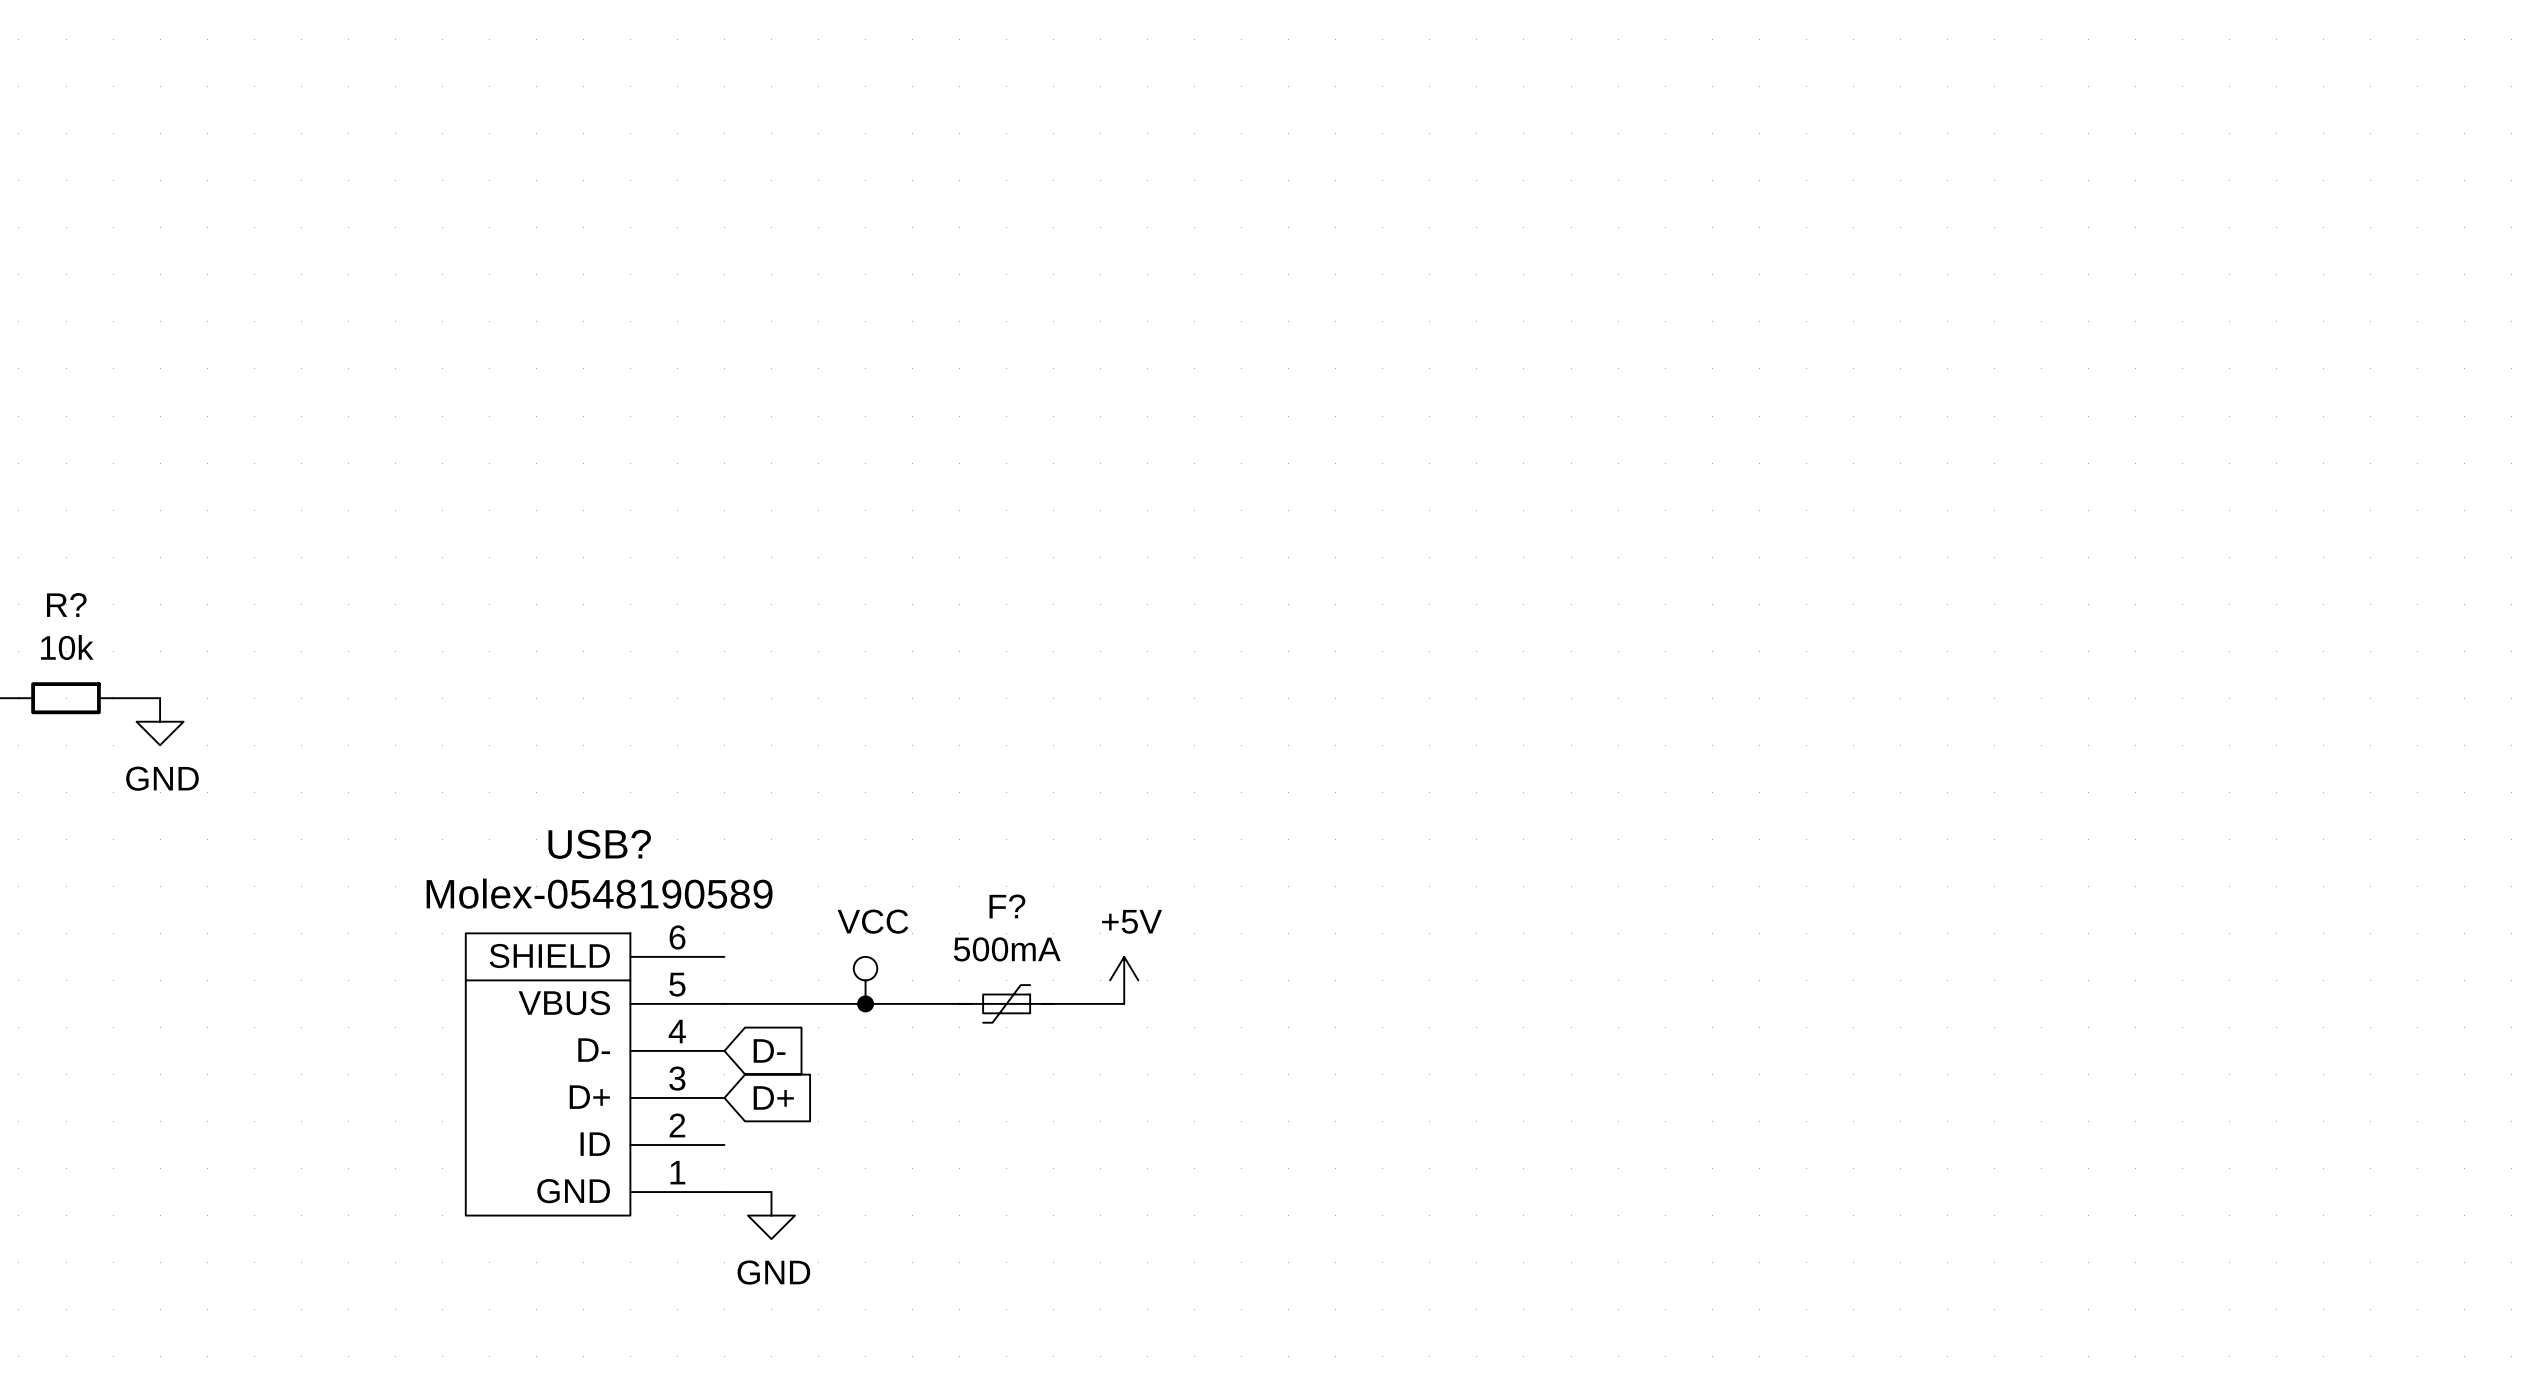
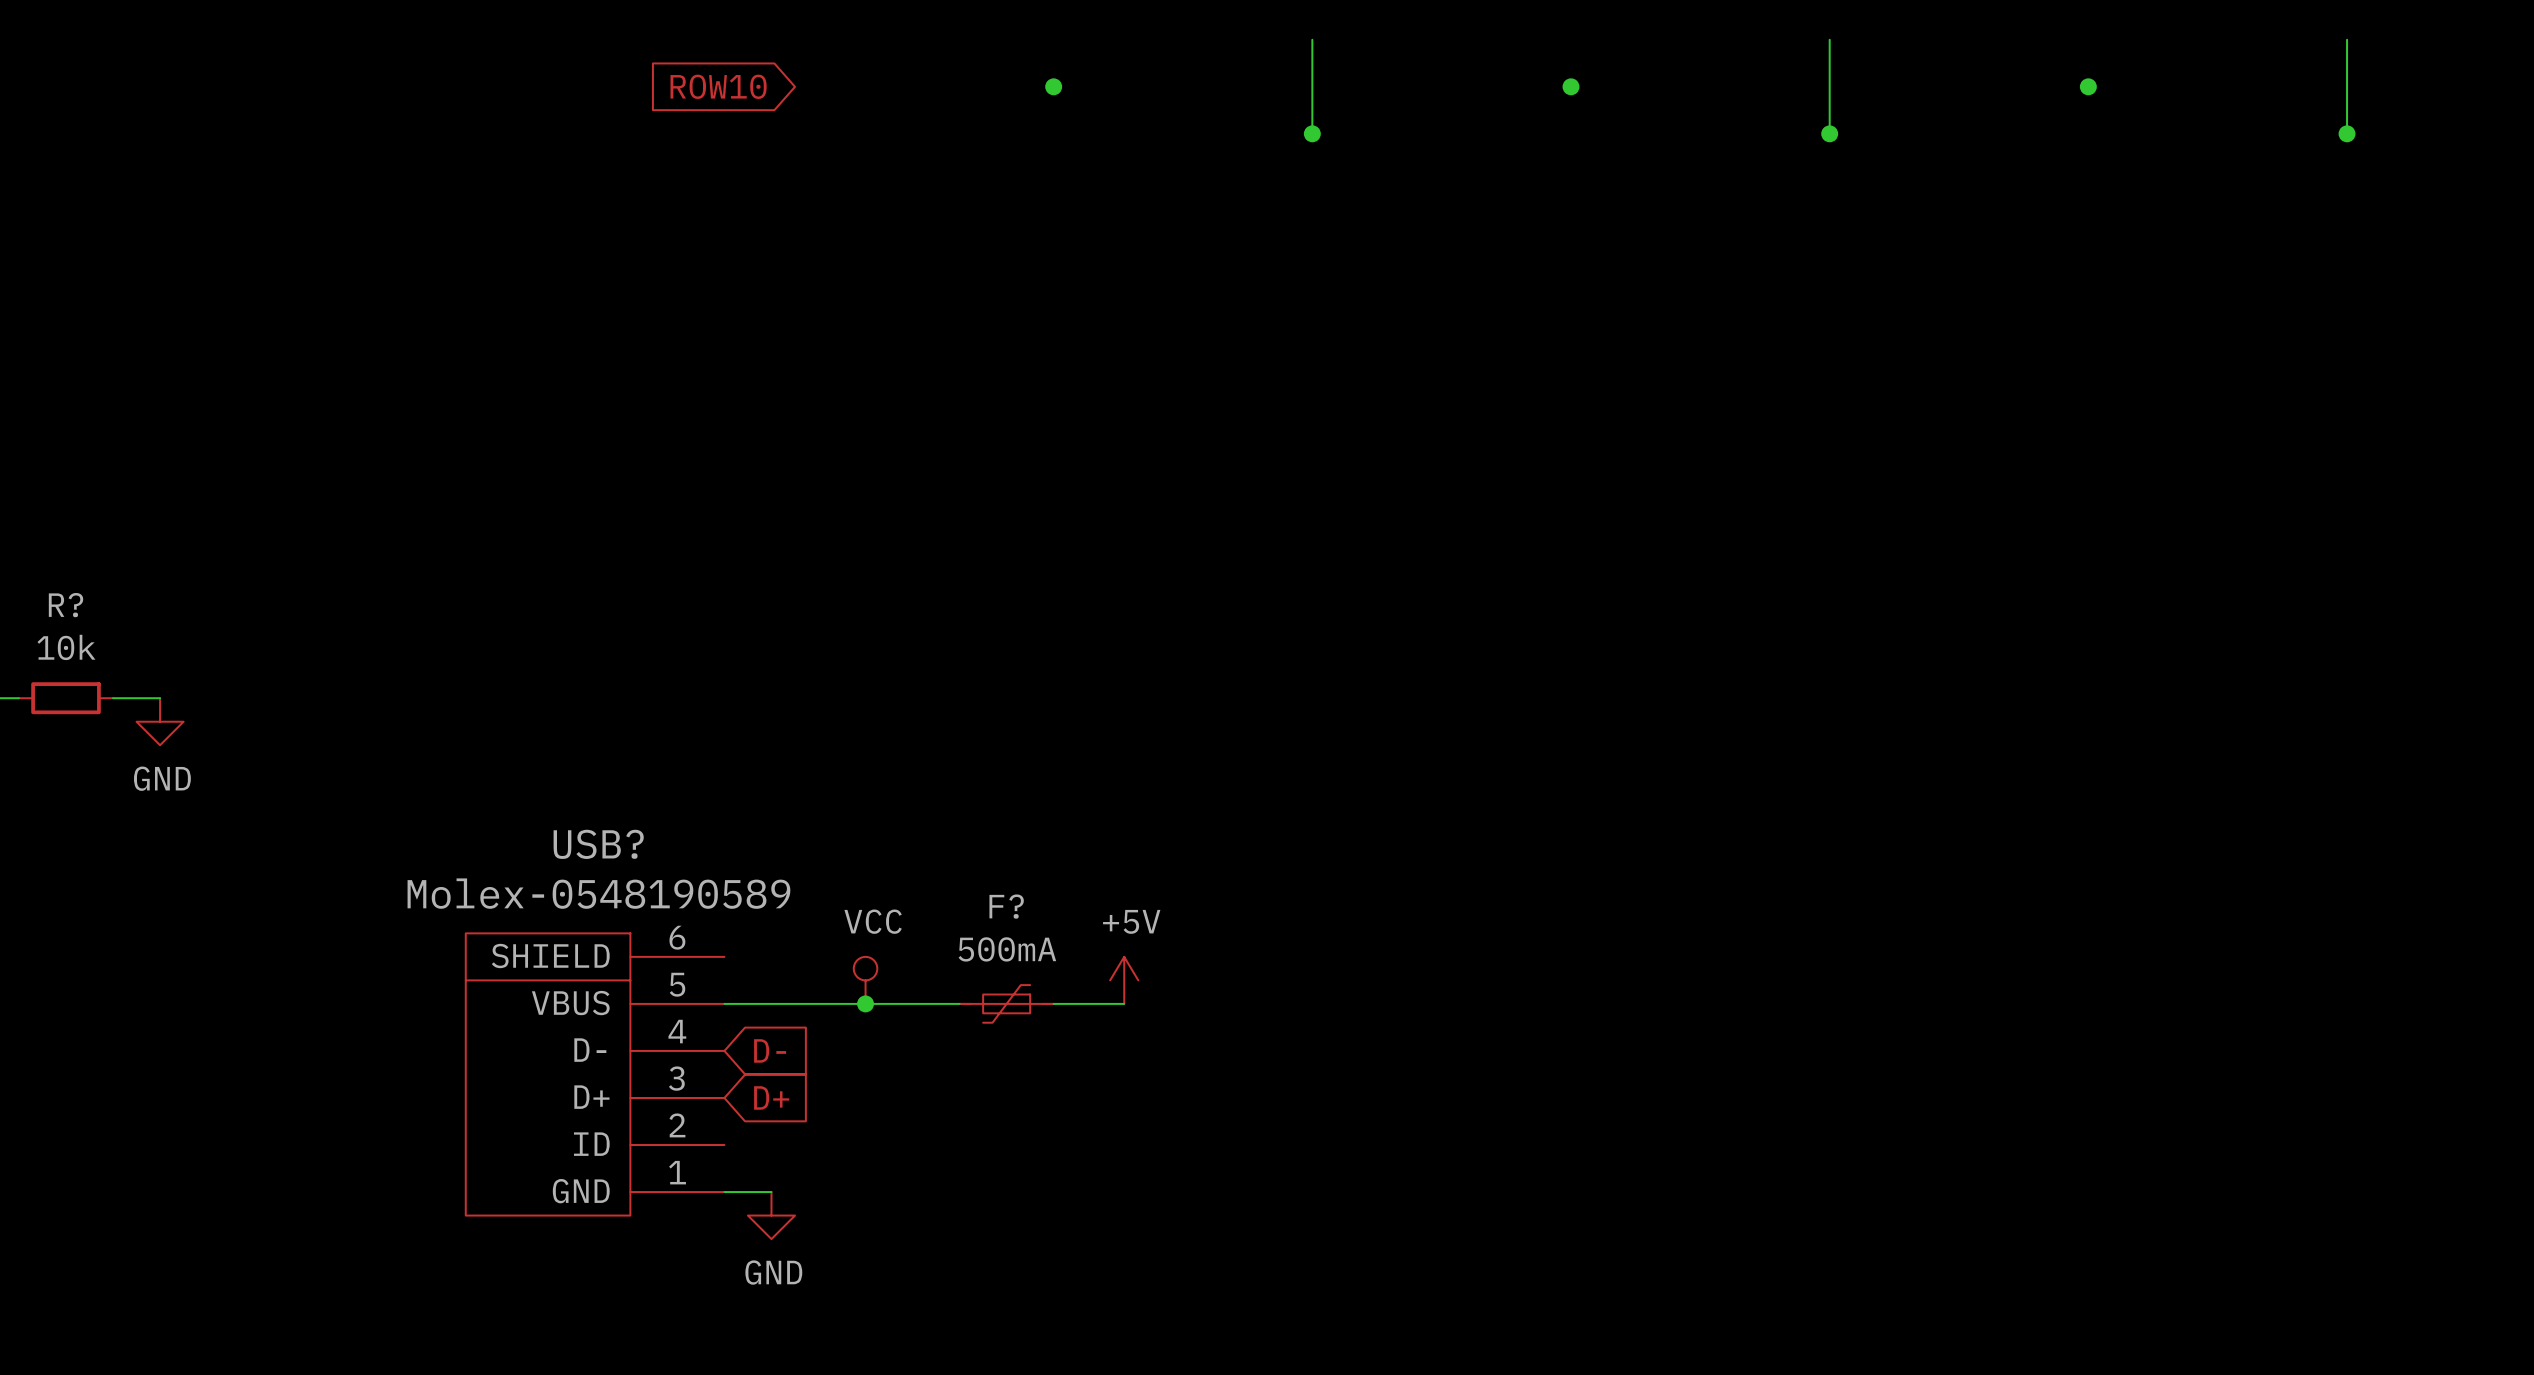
wire: none -> (1312, 39) (1312, 133)
wire: none -> (1829, 39) (1829, 133)
wire: none -> (2347, 39) (2347, 133)
global label: none -> ROW10 (718, 86)
junction: none -> (1053, 86)
junction: none -> (1571, 86)
junction: none -> (2088, 86)
junction: none -> (1312, 133)
junction: none -> (1829, 133)
junction: none -> (2347, 133)

